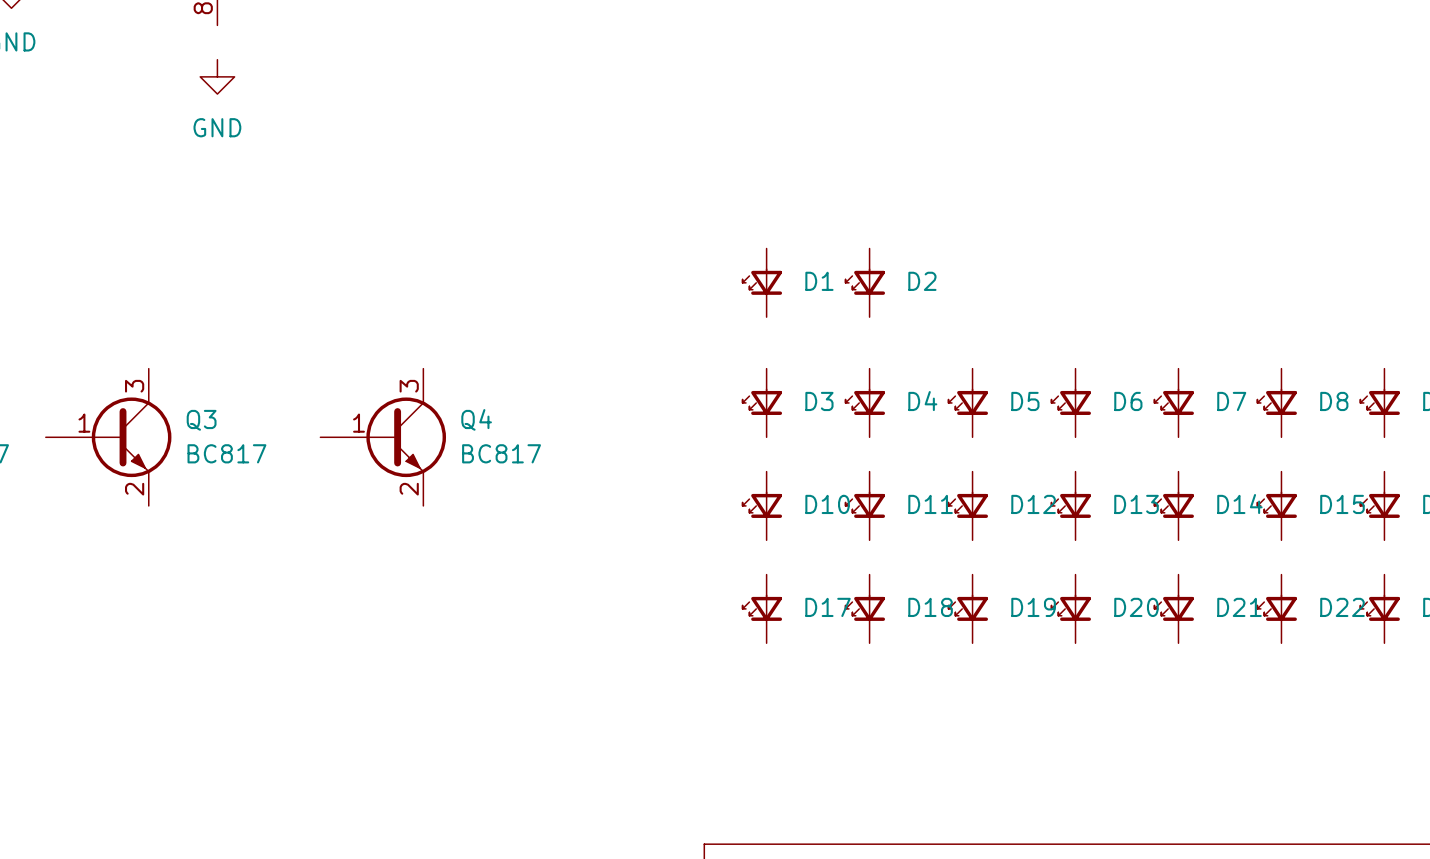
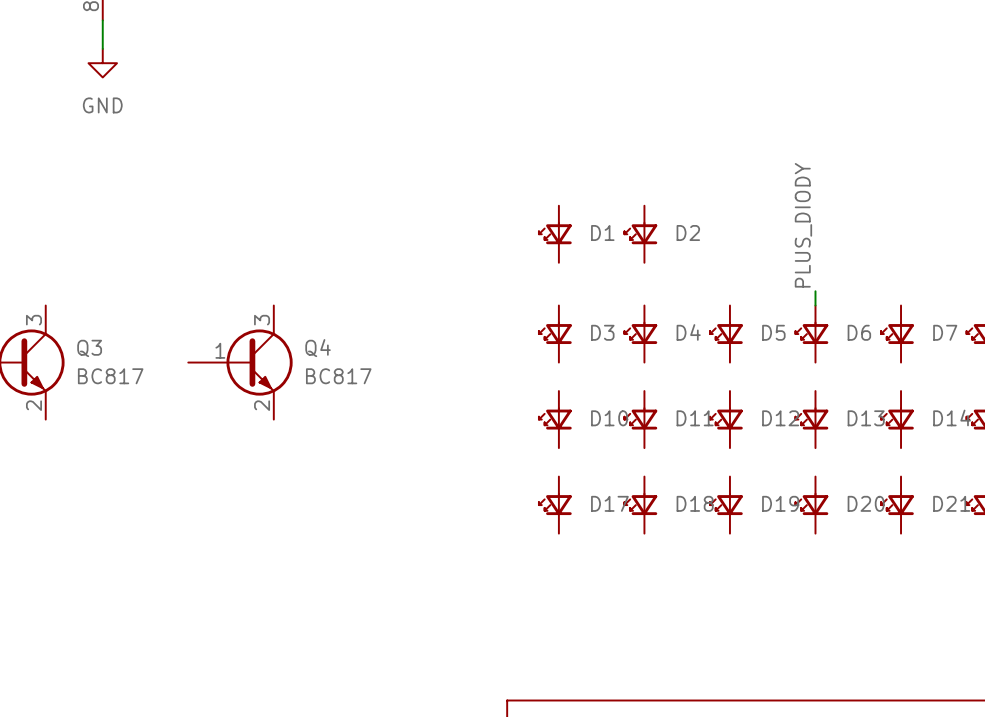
wire: none -> (102, 20) (102, 48)
label: none -> PLUS_DIODY (803, 225)
wire: none -> (815, 291) (815, 305)

